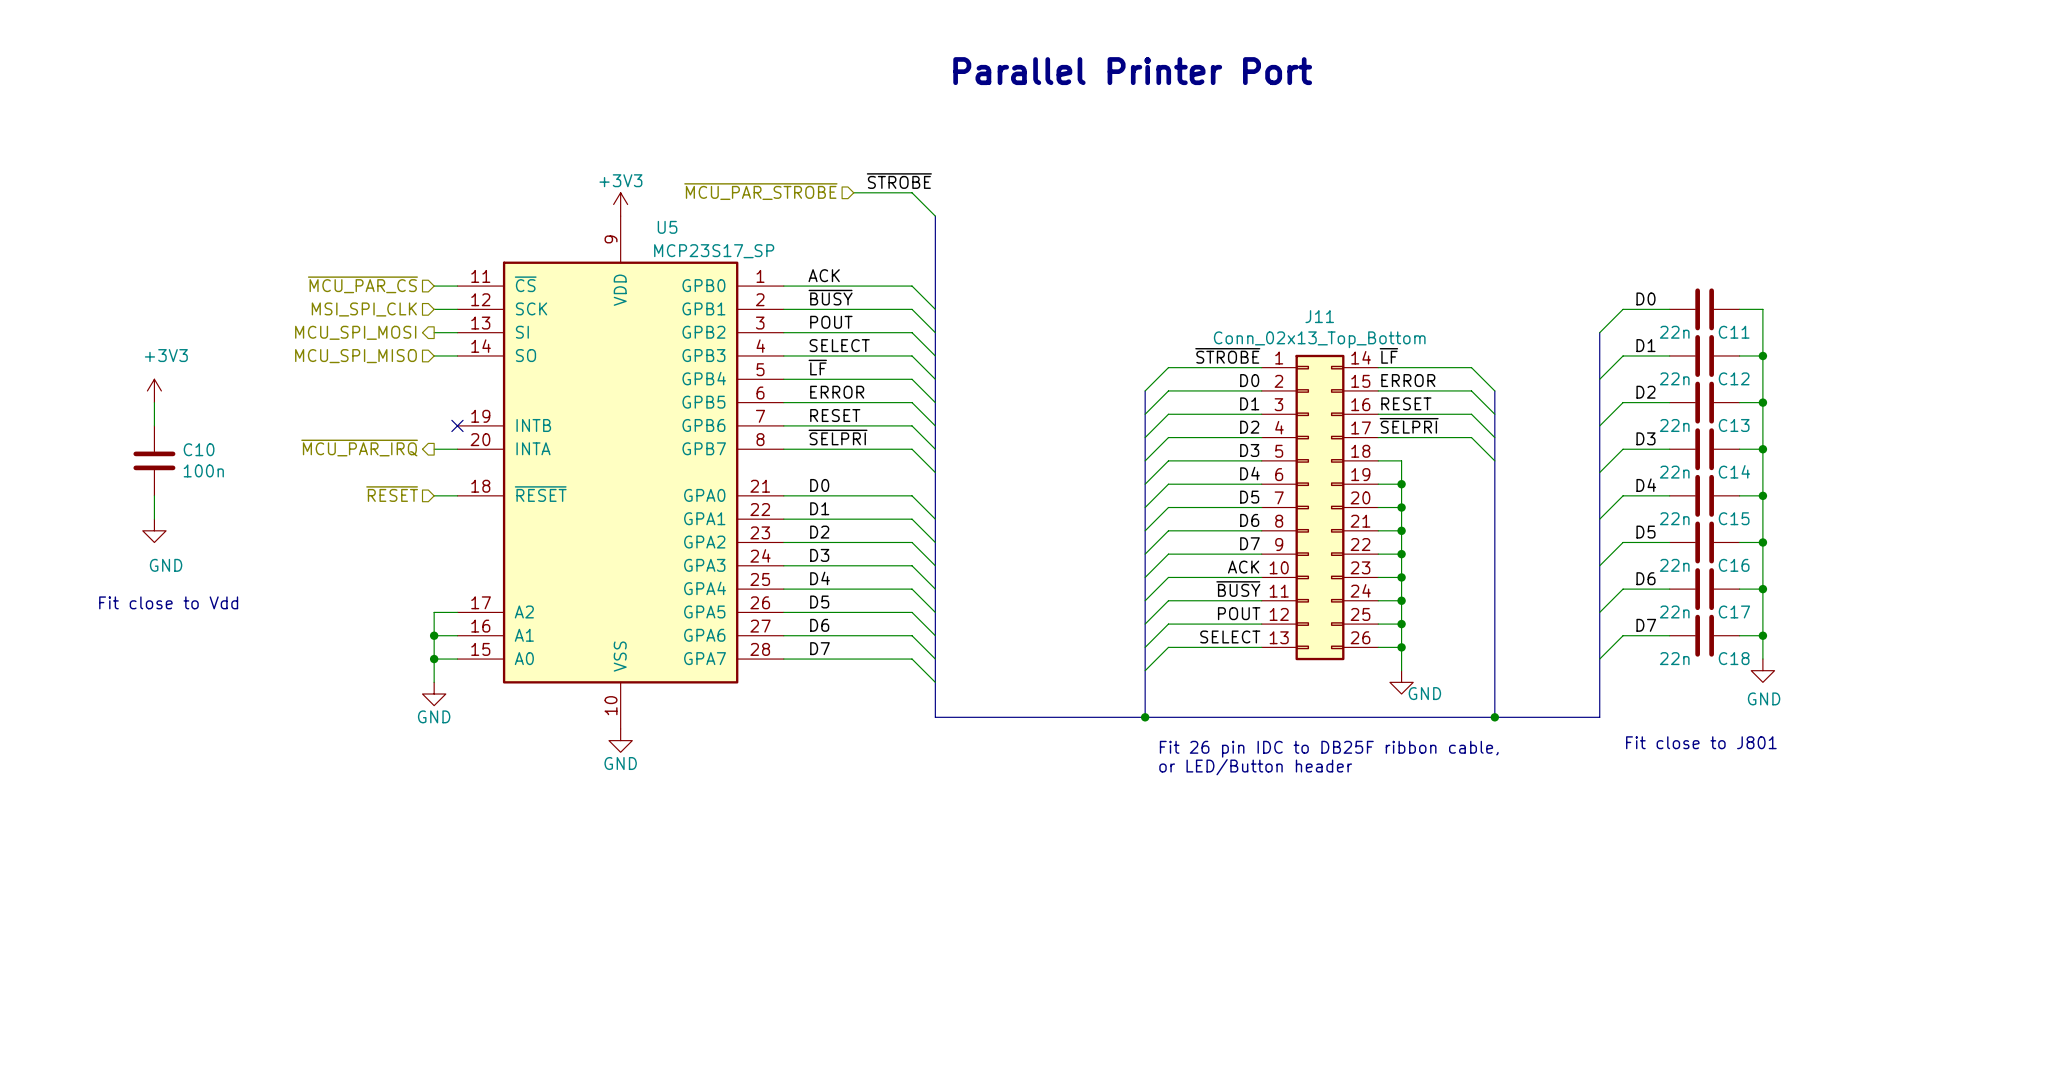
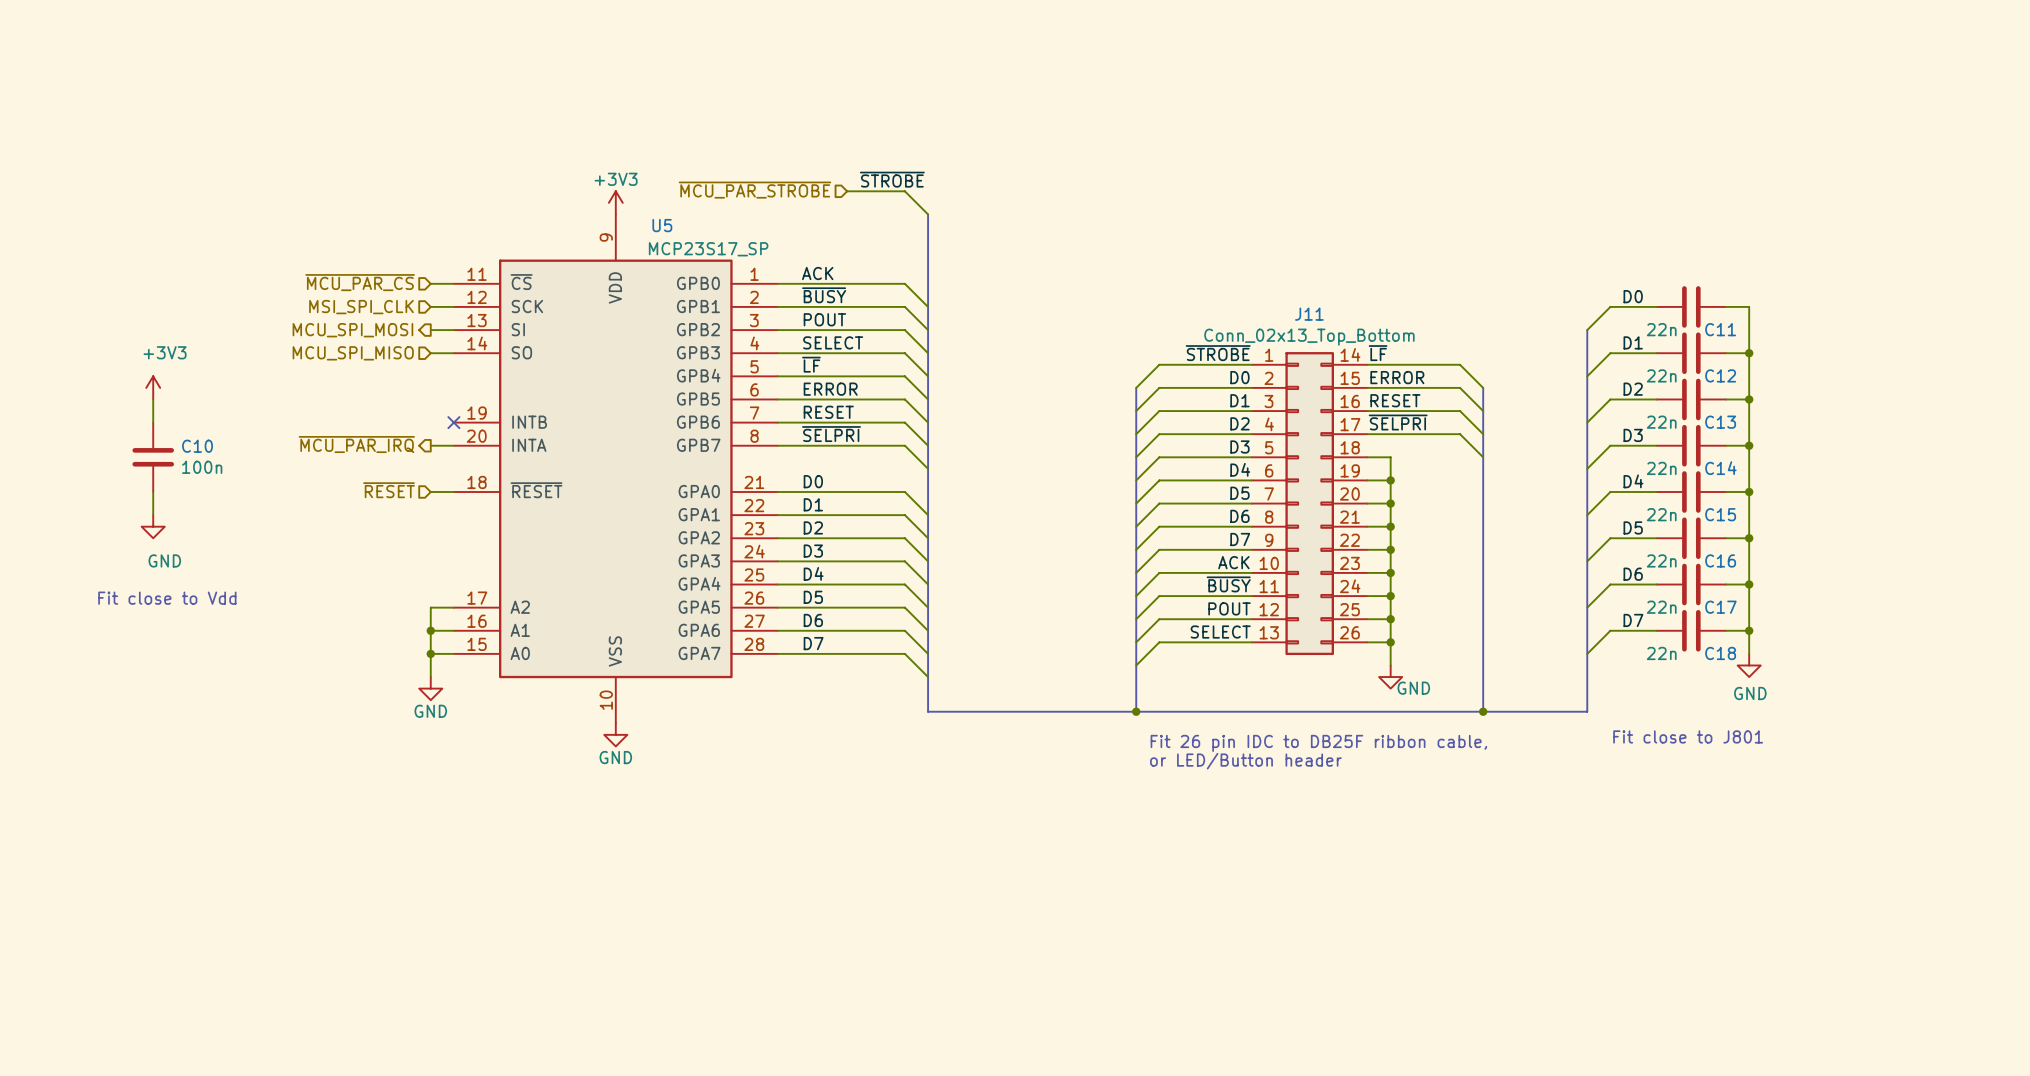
text: Parallel Printer Port (1132, 71) -> none

